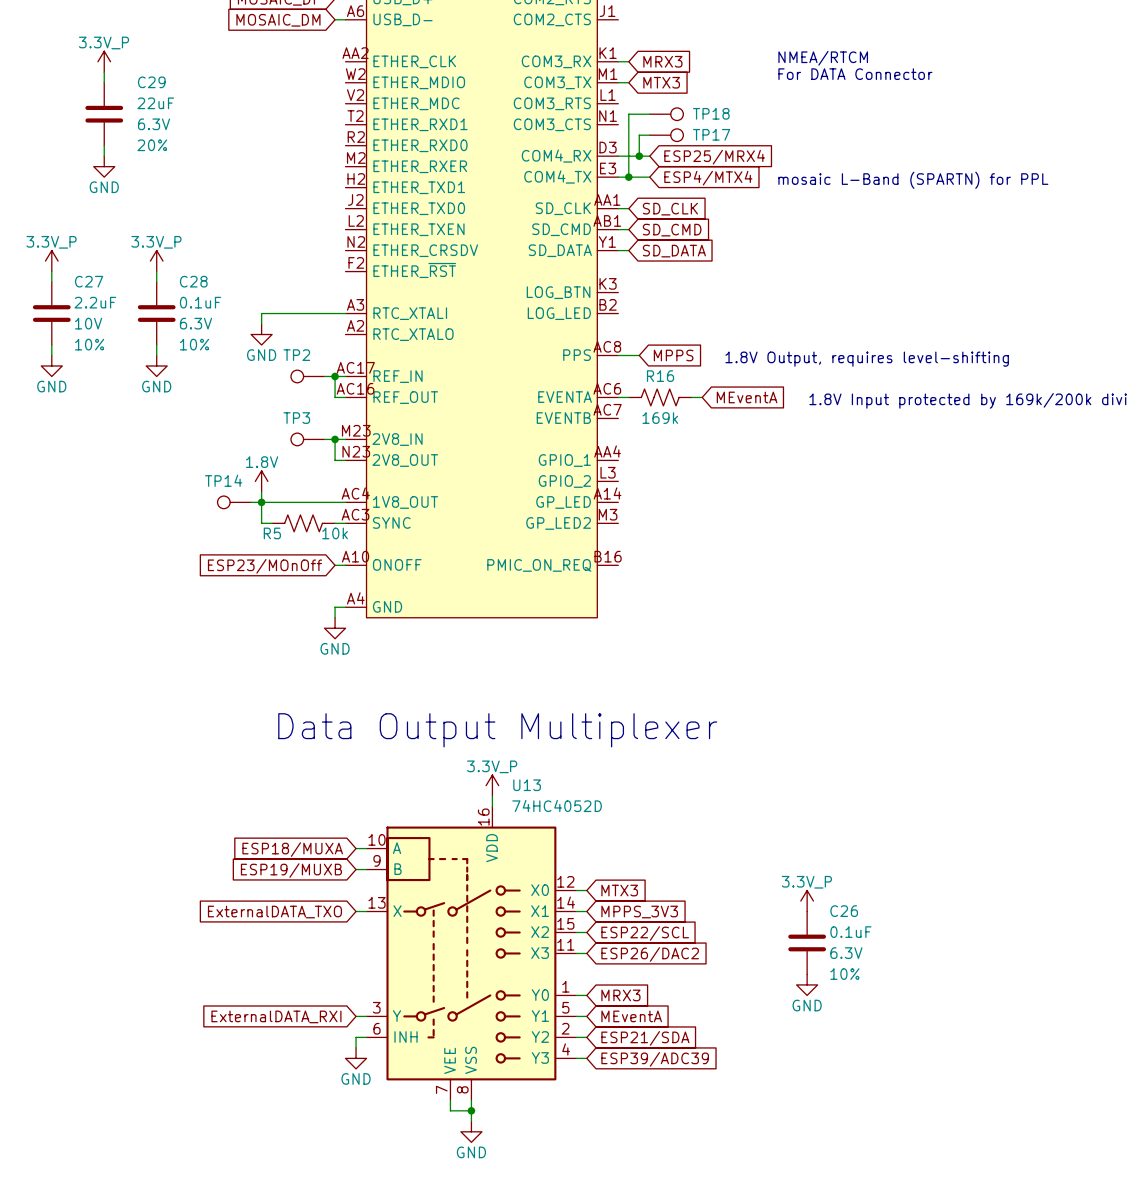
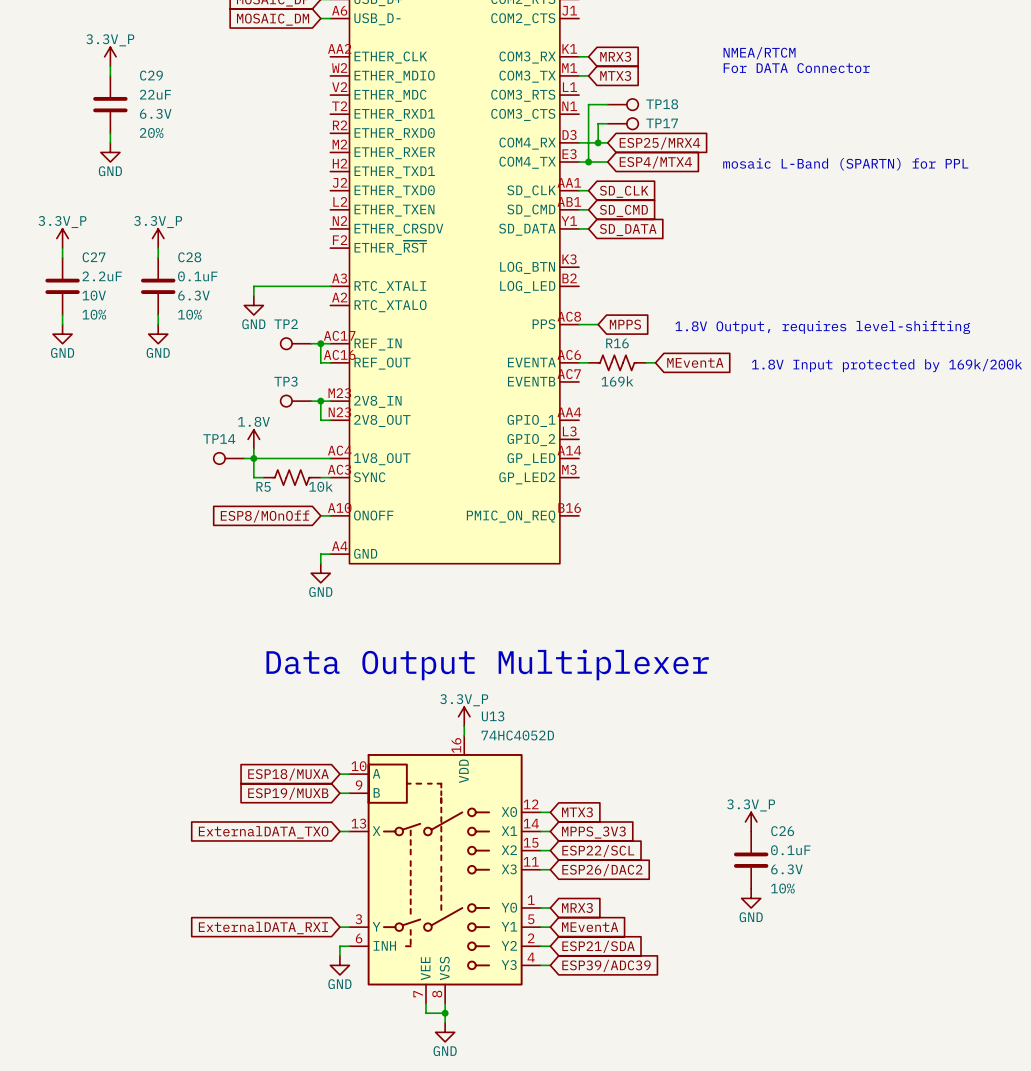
global label: ESP23/MOnOff (264, 566) -> ESP8/MOnOff (265, 516)

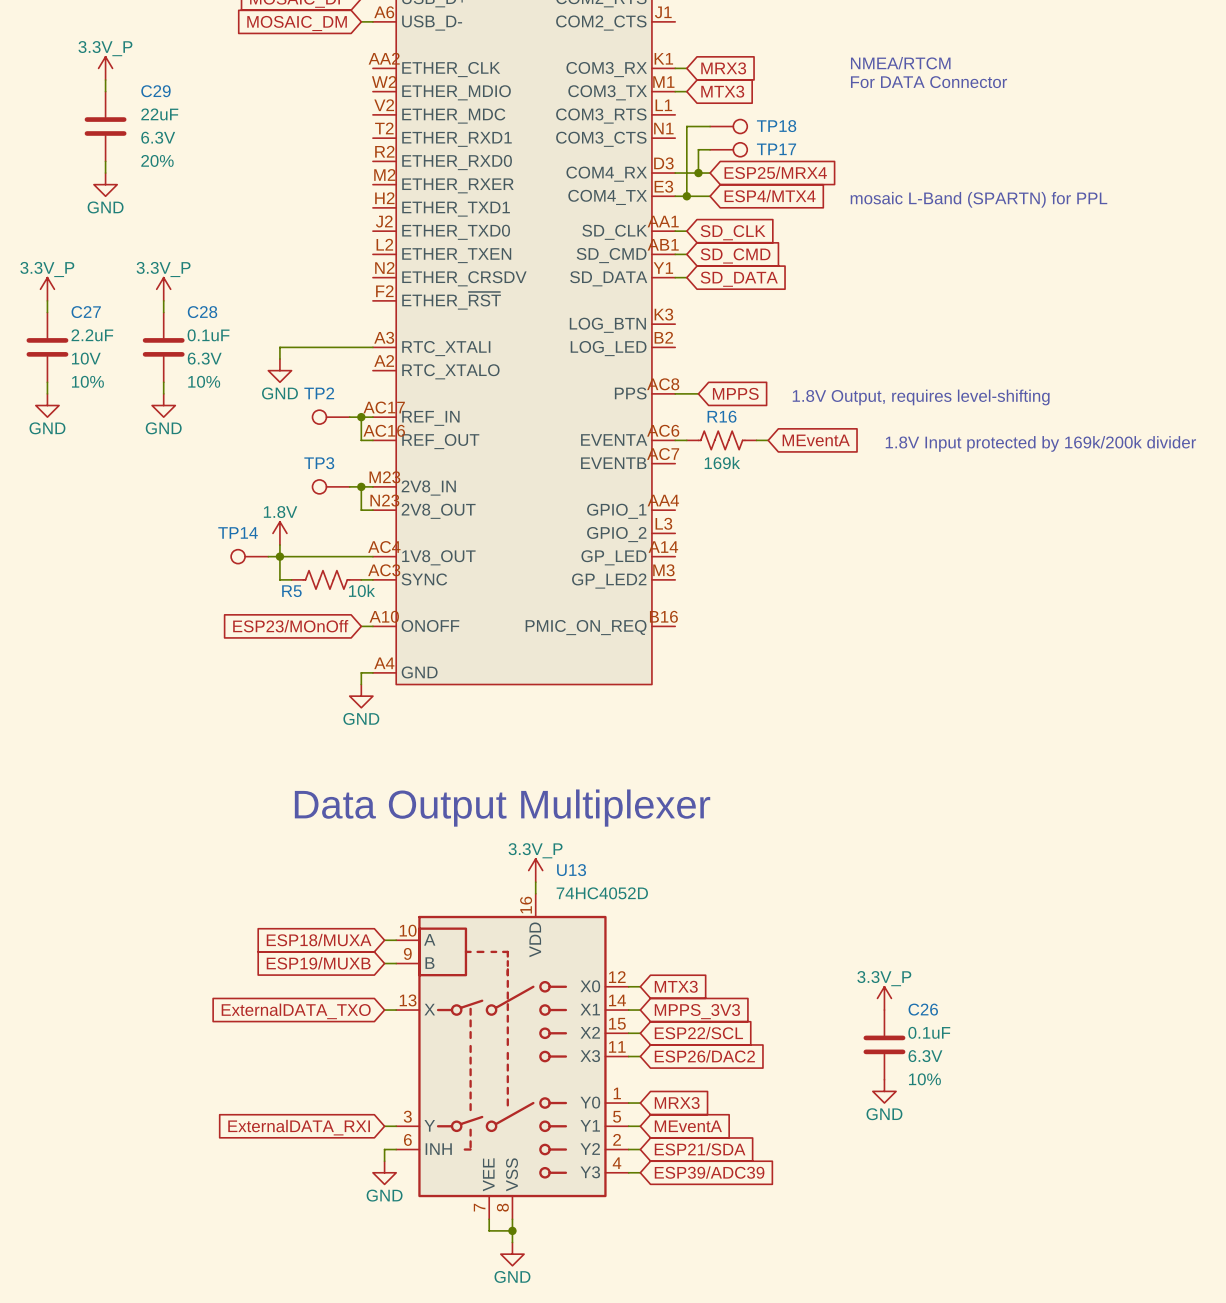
global label: ESP8/MOnOff (265, 516) -> ESP23/MOnOff (290, 626)

